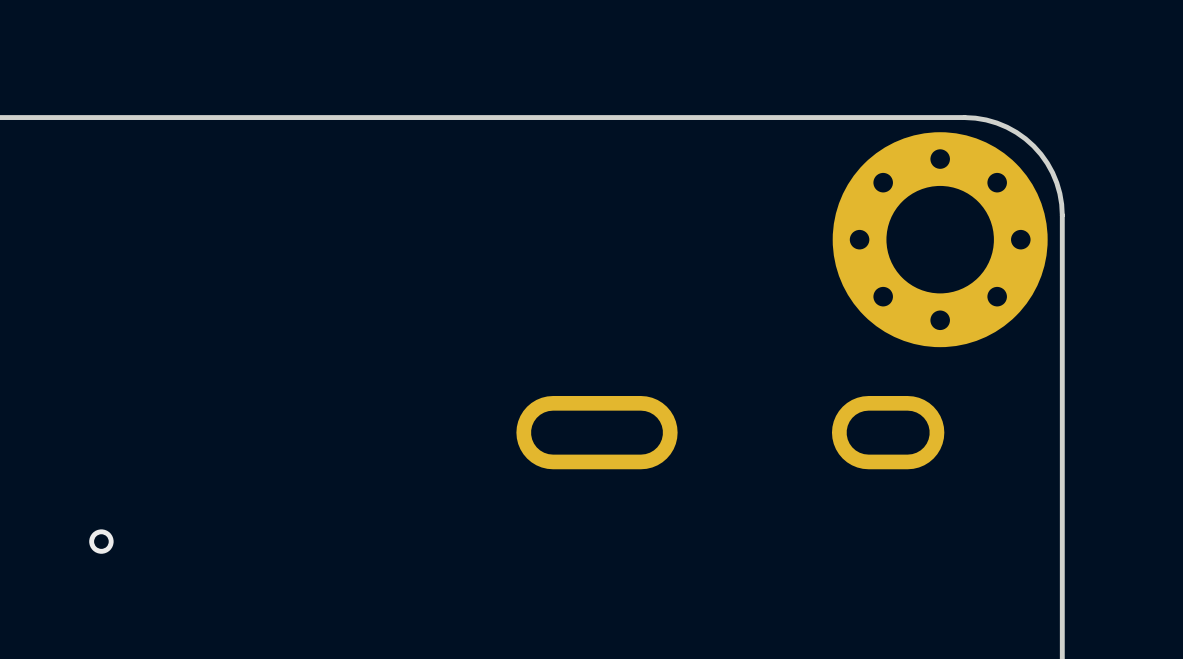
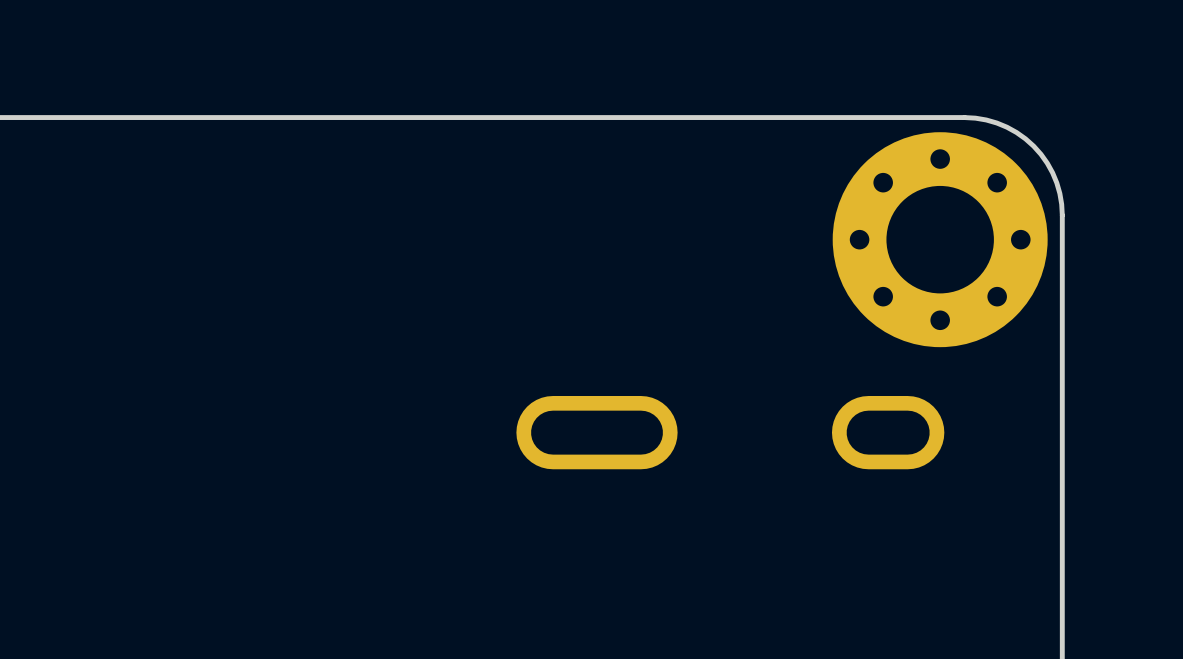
via: (101, 541) -> none

